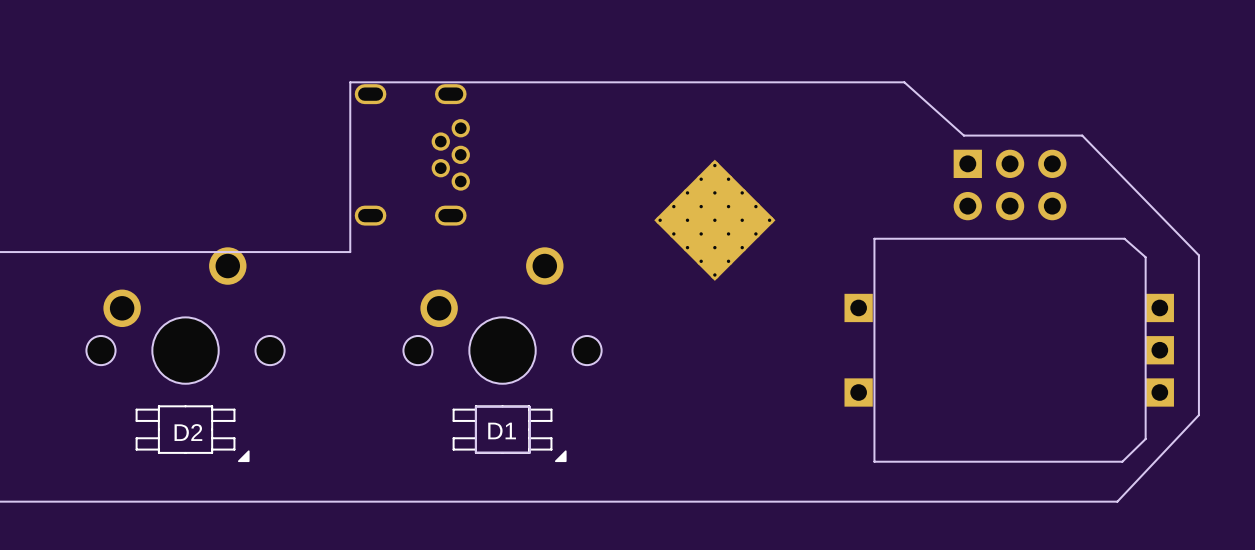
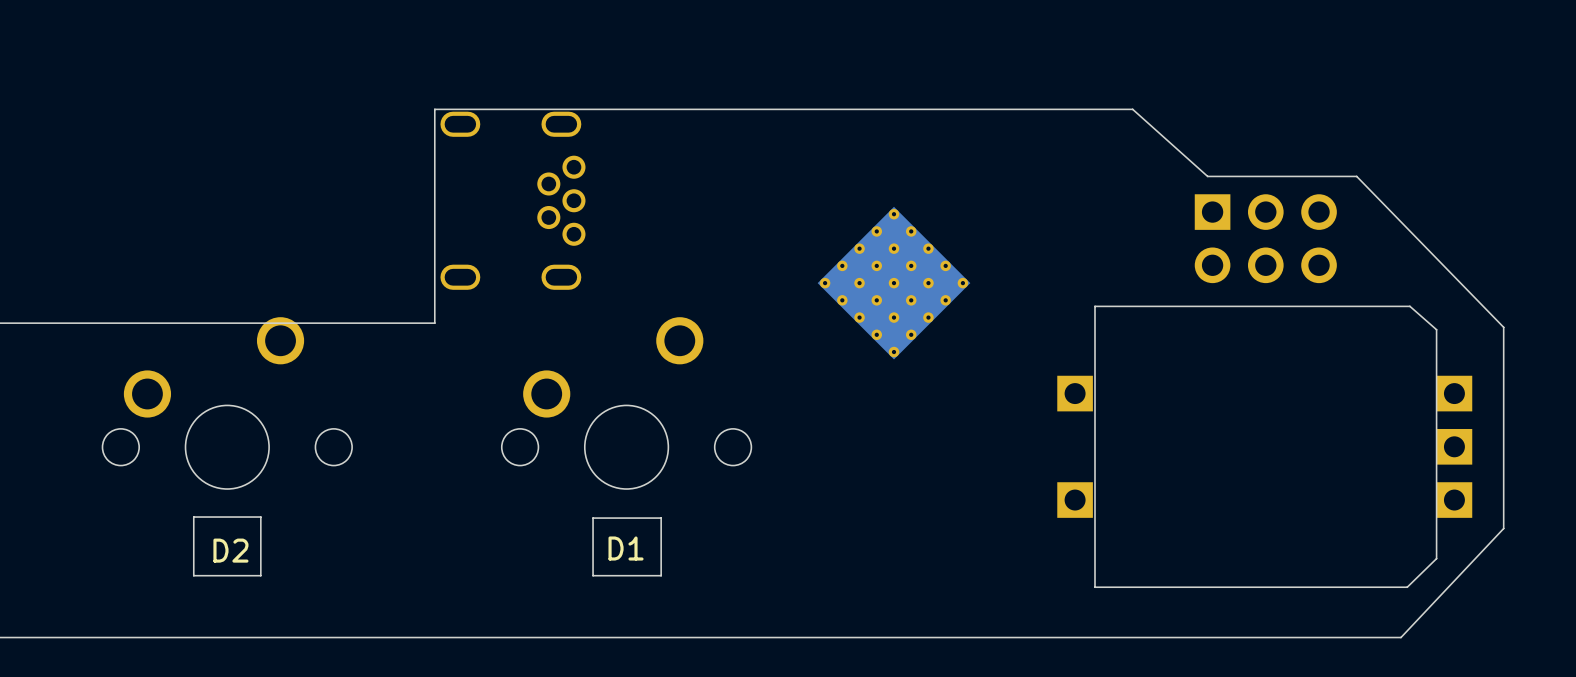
board edge: none -> (260, 517) (193, 517) (193, 575) (260, 575) (260, 517)
D2 footprint: [136, 406, 250, 463] -> [213, 538, 249, 563]
D1 footprint: [453, 406, 567, 463] -> [608, 536, 644, 561]

